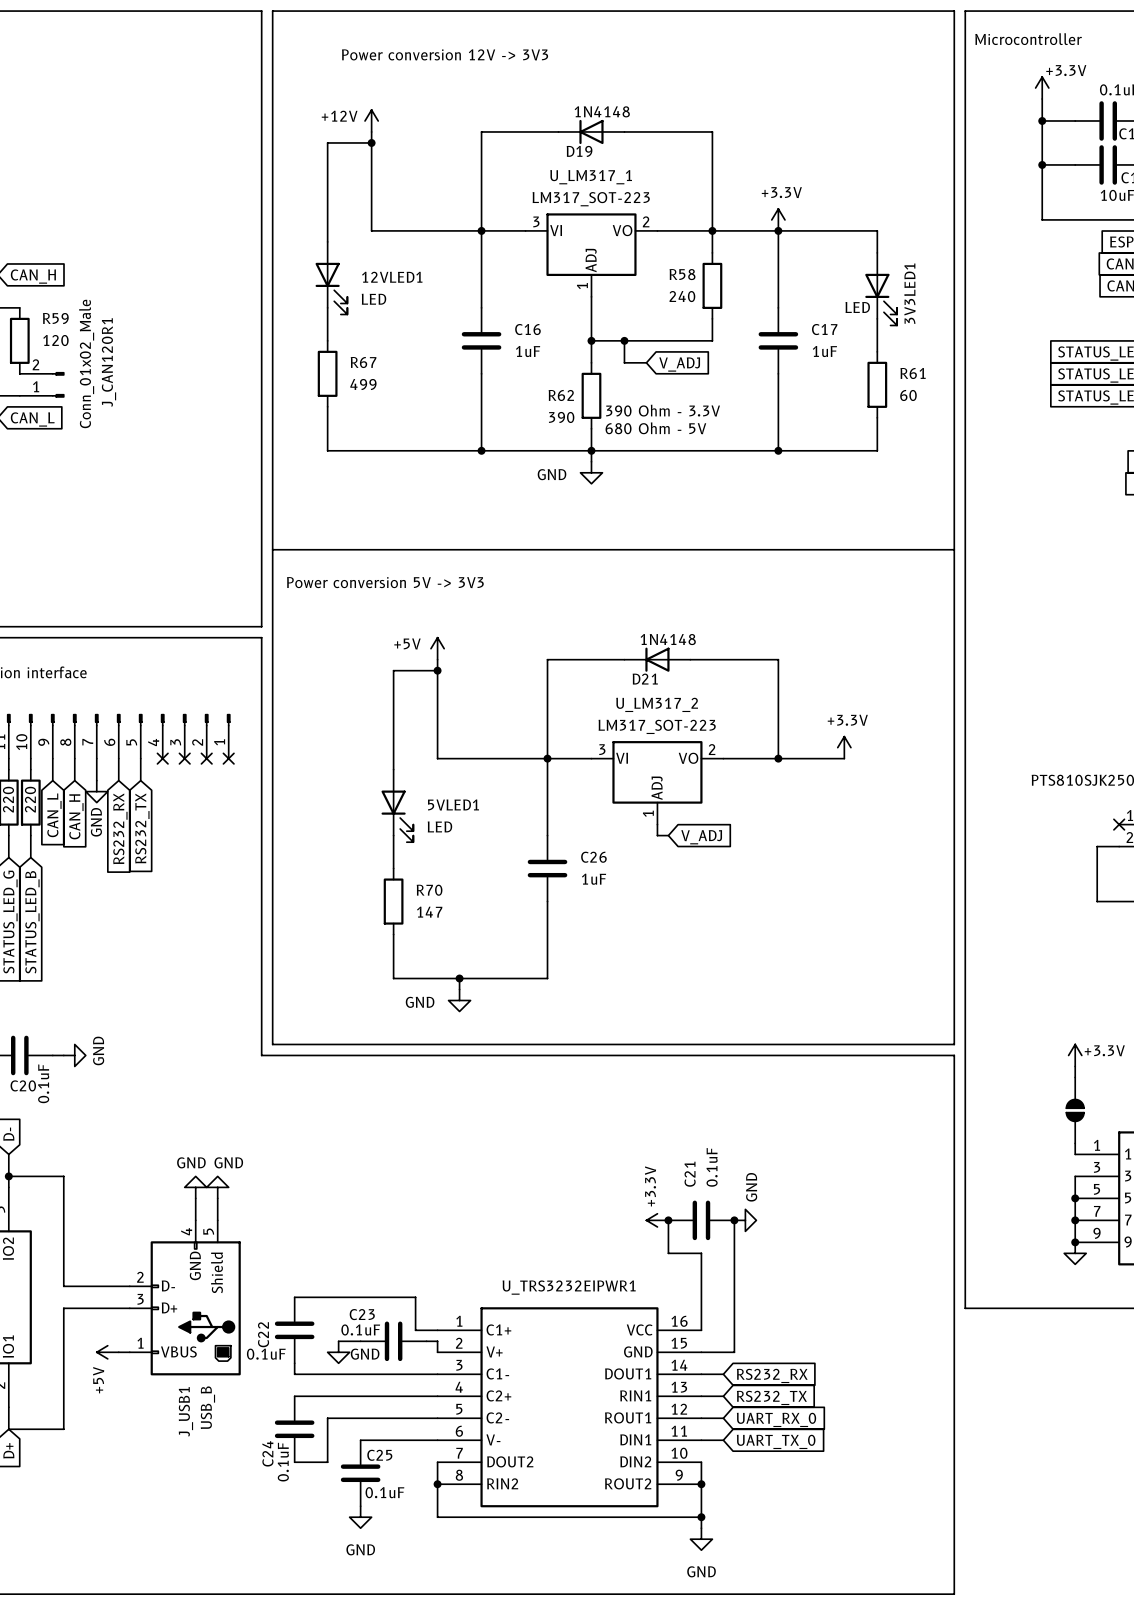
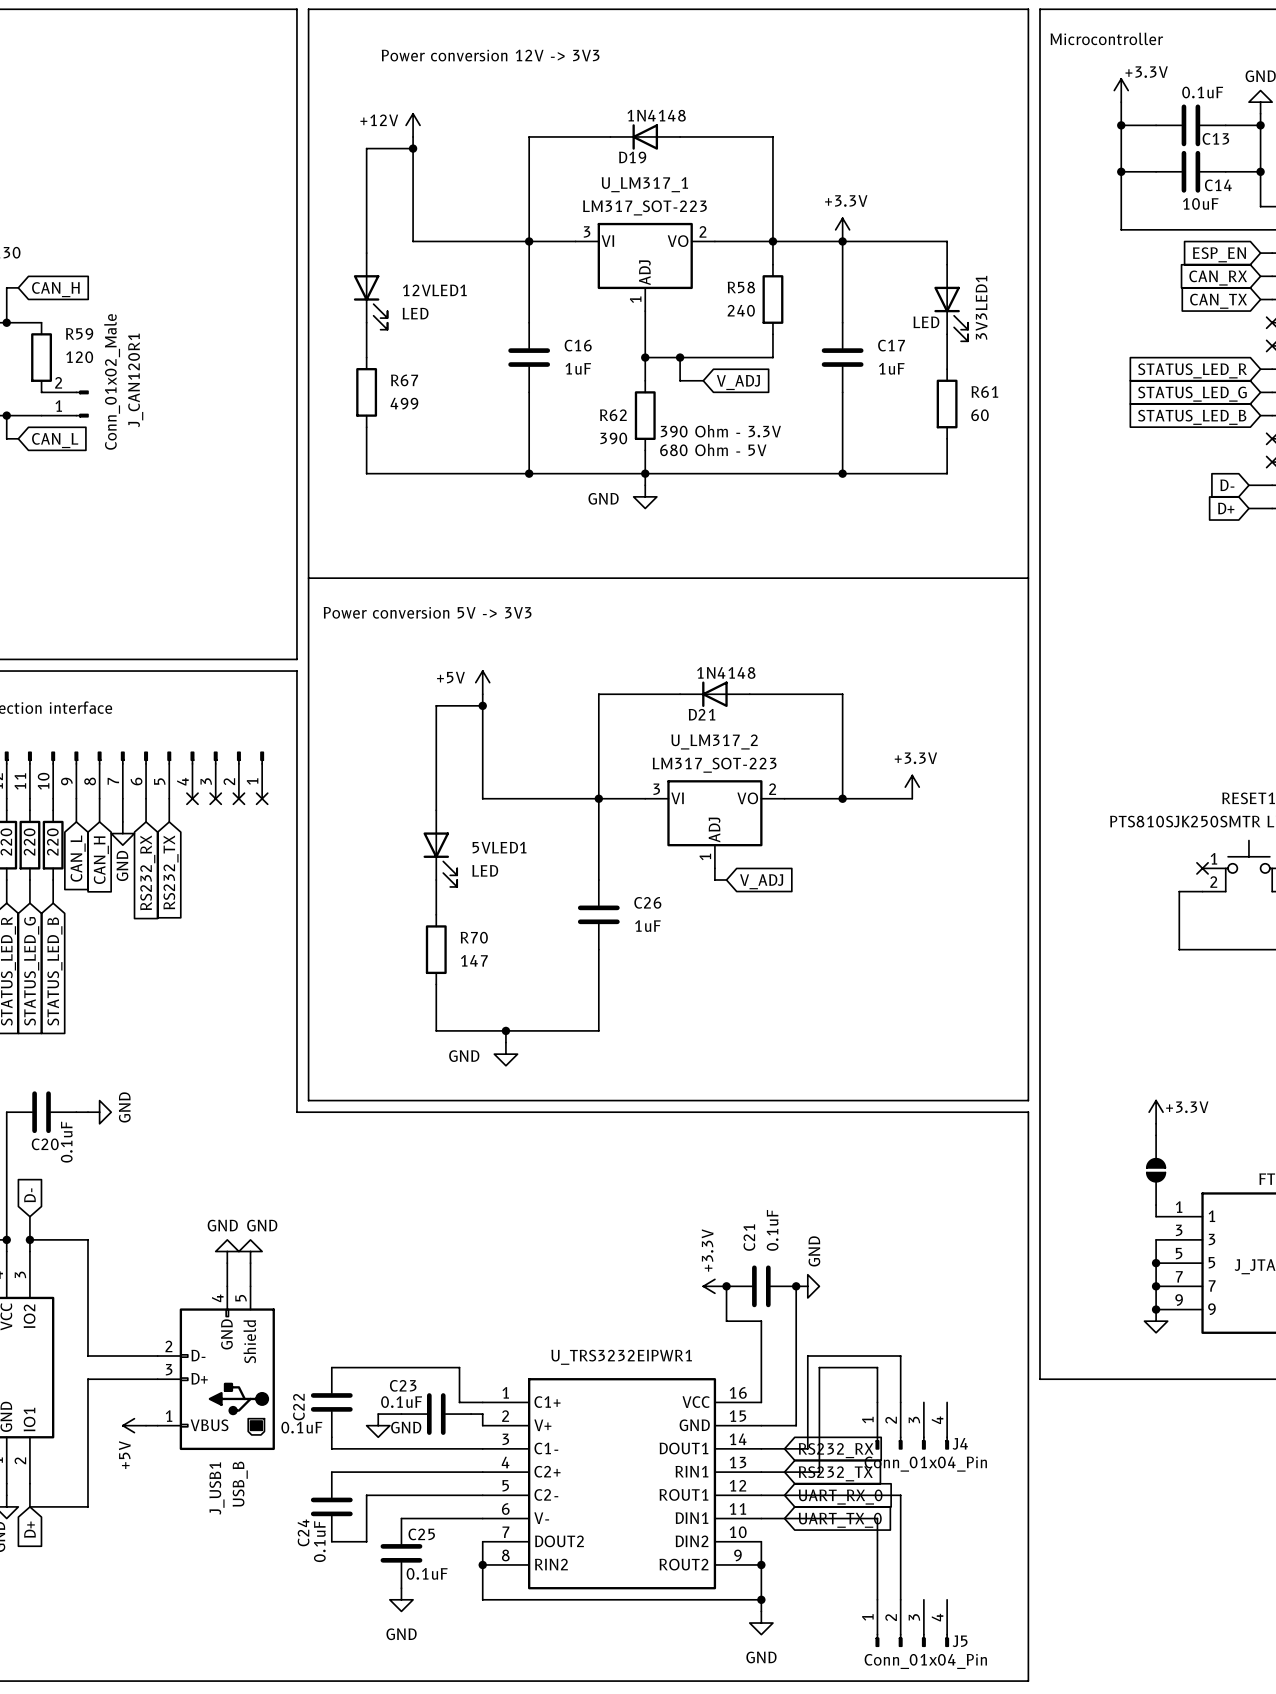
wire: none -> (877, 1402) (877, 1367) (819, 1367) (819, 1472) (784, 1472)
wire: none -> (900, 1402) (900, 1356) (807, 1356) (807, 1448) (784, 1448)
J4: none -> Conn_01x04_Pin (912, 1426)
wire: none -> (784, 1495) (900, 1495) (900, 1599)
wire: none -> (784, 1518) (877, 1518) (877, 1599)
J5: none -> Conn_01x04_Pin (912, 1623)

